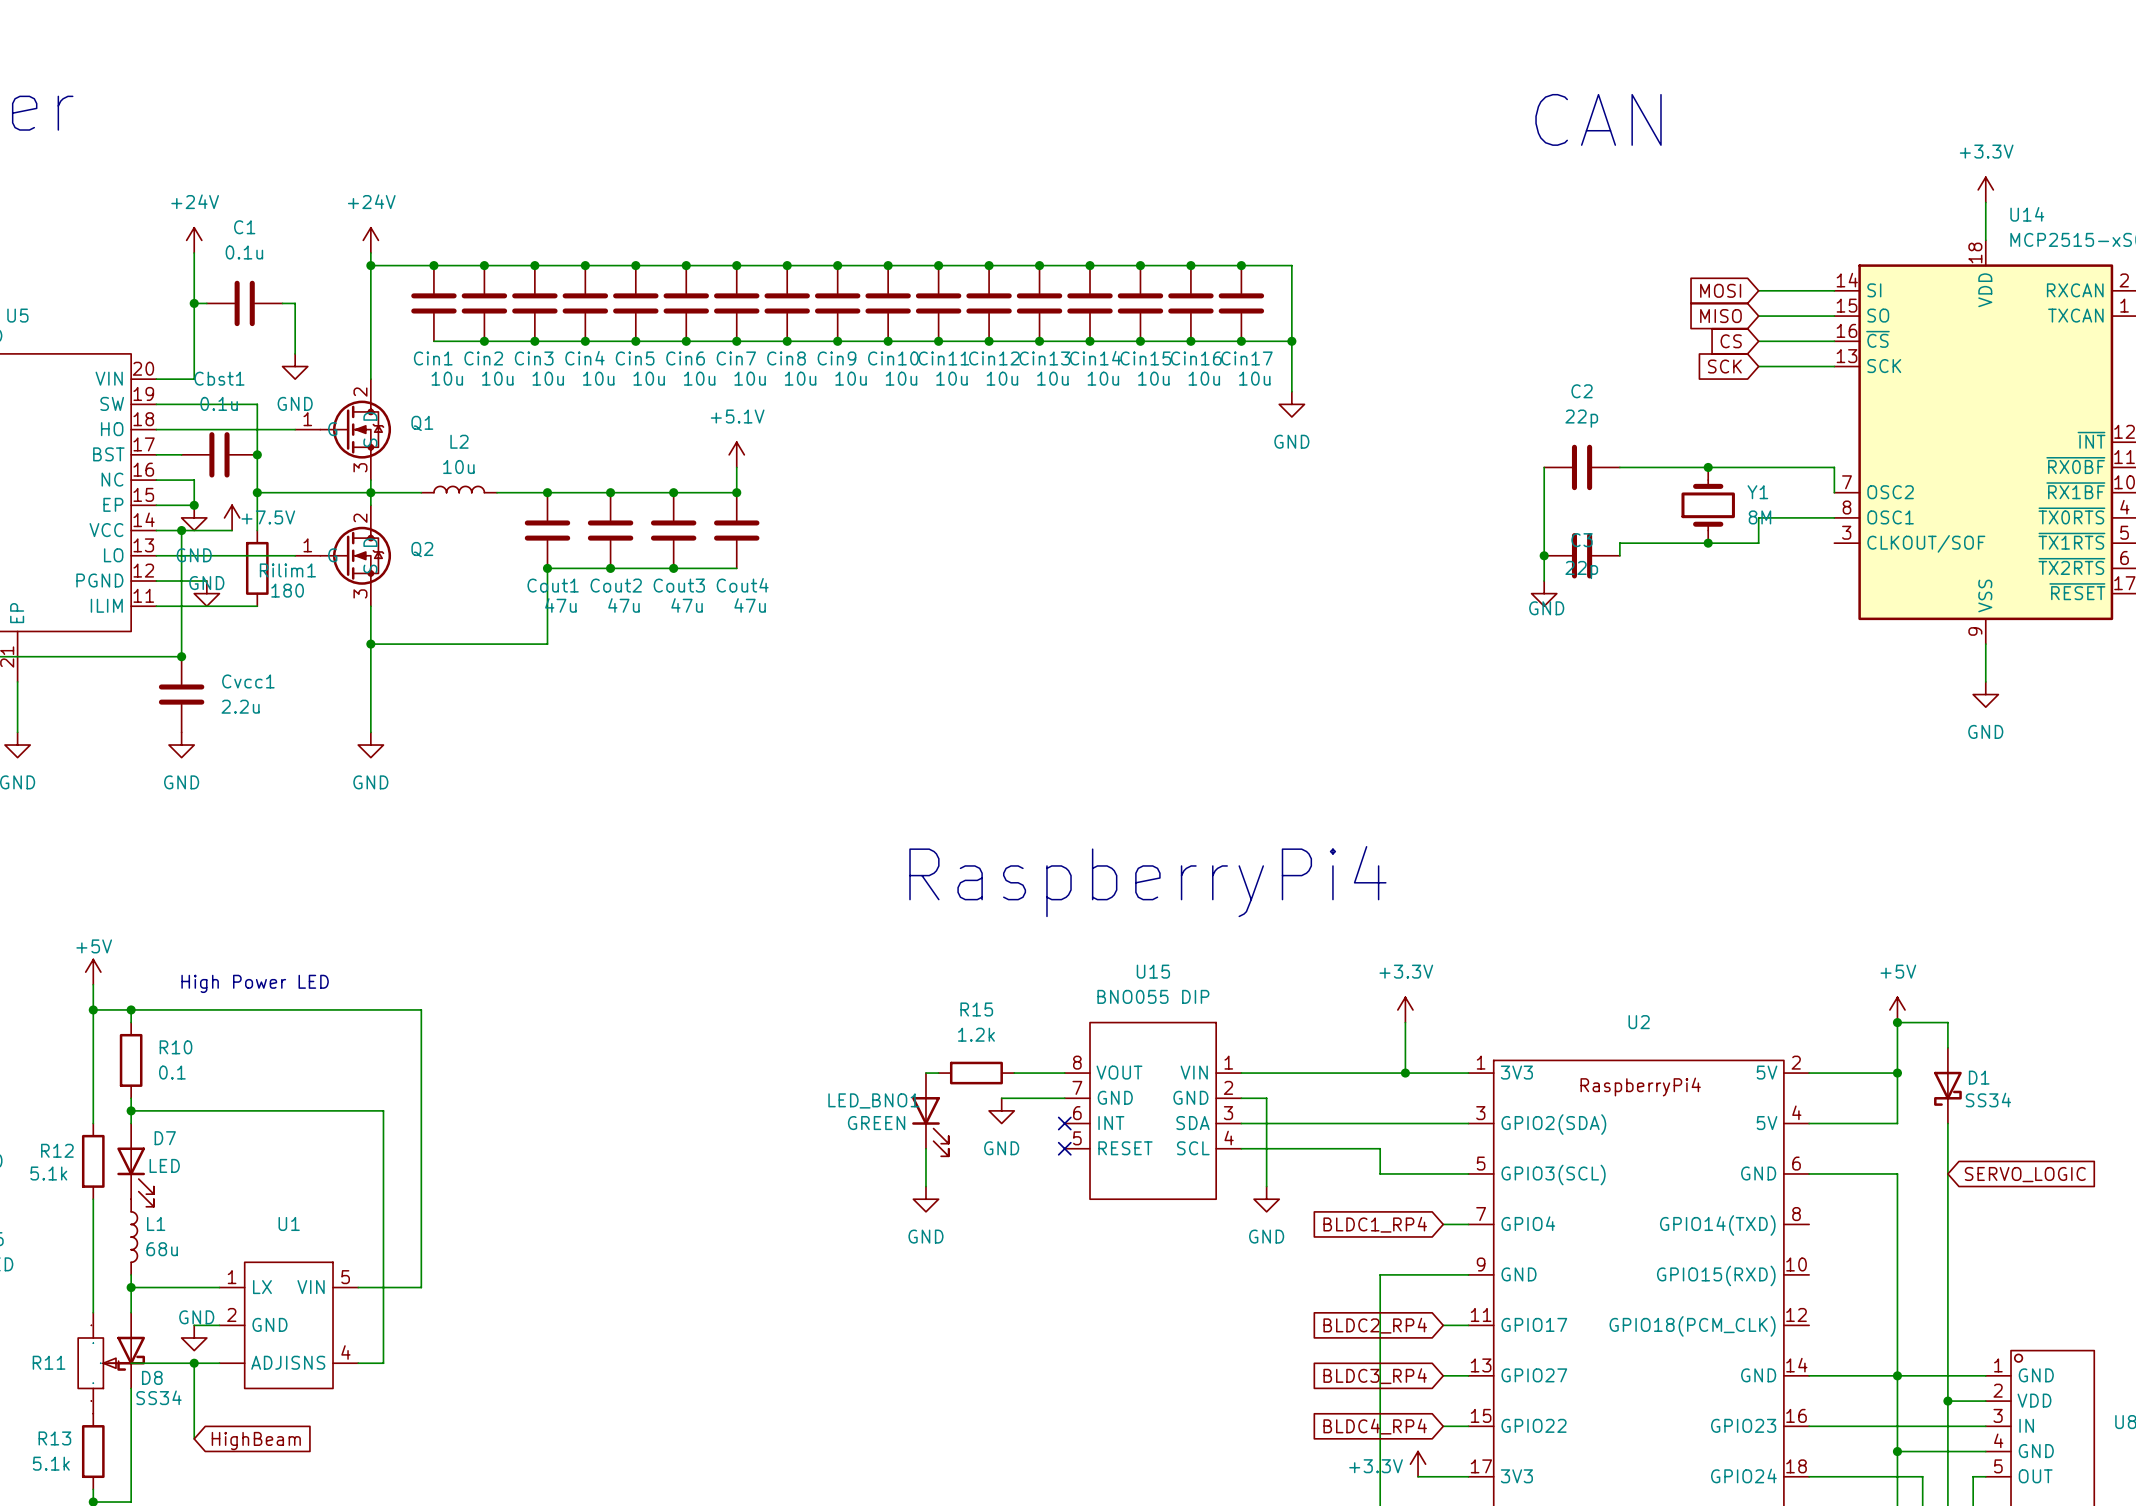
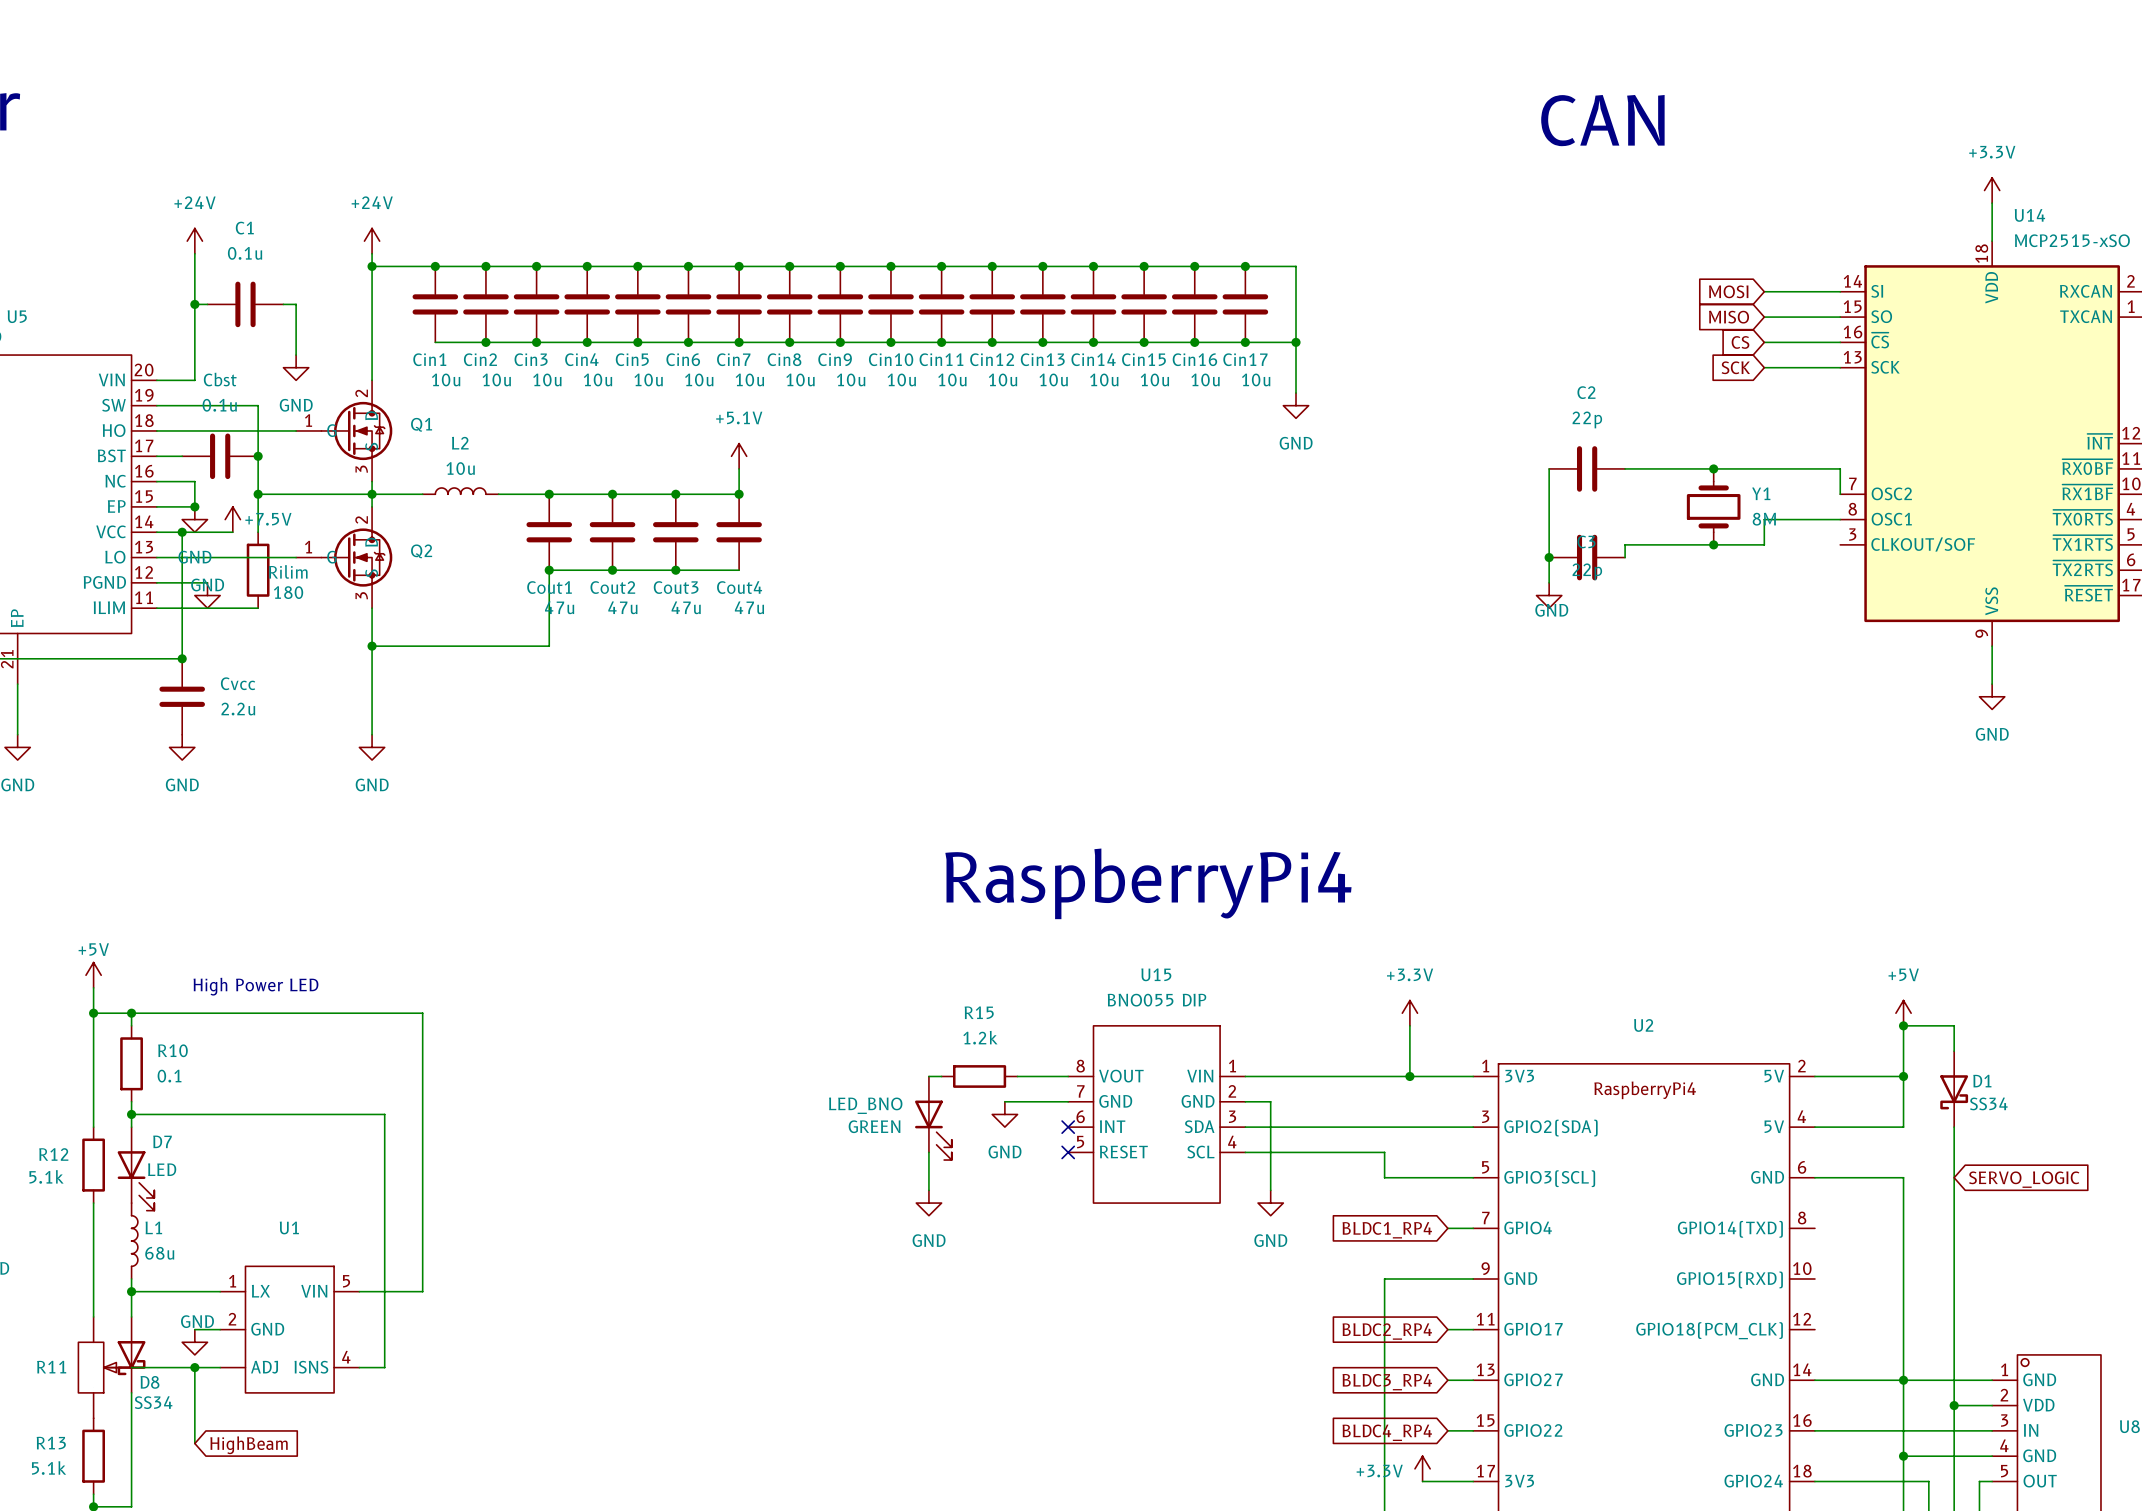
Cbst1 name: Cbst1 (219, 378) -> Cbst (220, 379)
Rilim1 name: Rilim1 (287, 570) -> Rilim (288, 571)
Cvcc1 name: Cvcc1 (248, 681) -> Cvcc (238, 683)
LED_BNO1 name: LED_BNO1 (873, 1100) -> LED_BNO (865, 1105)

